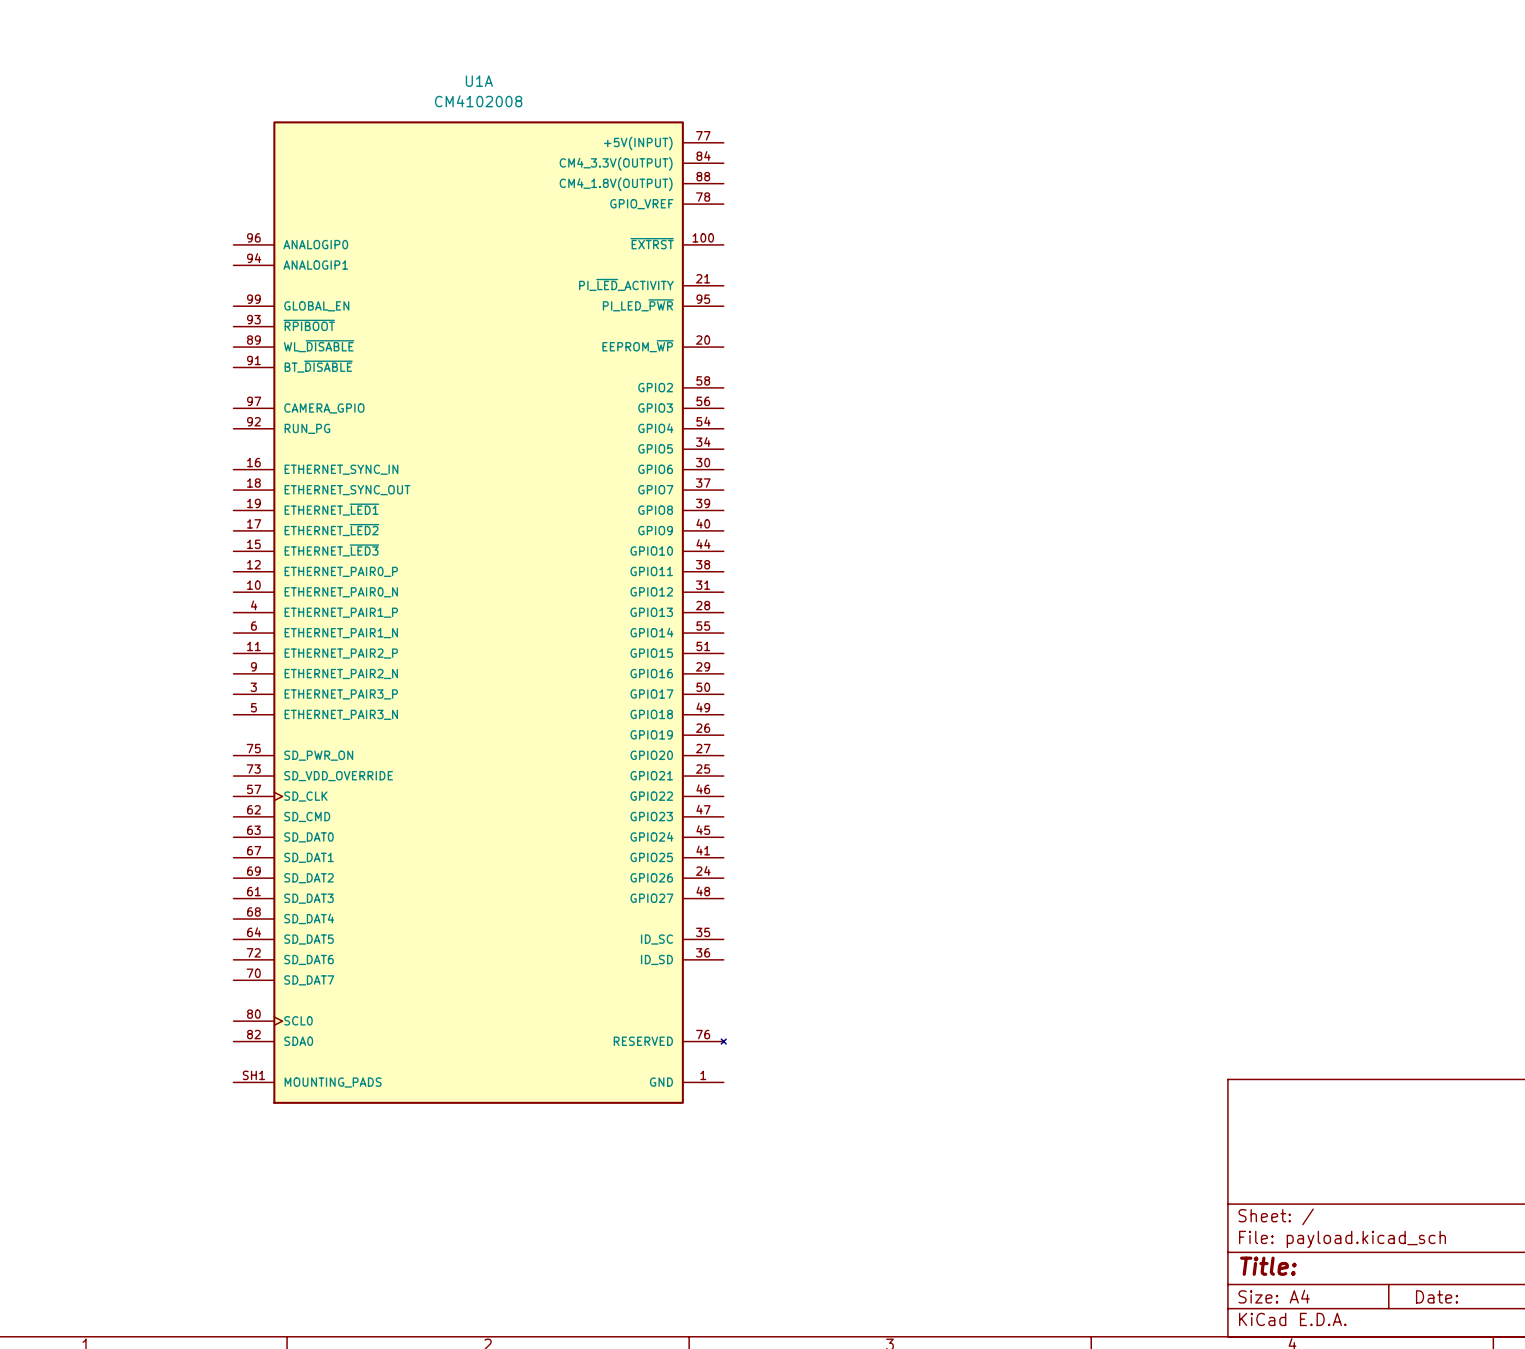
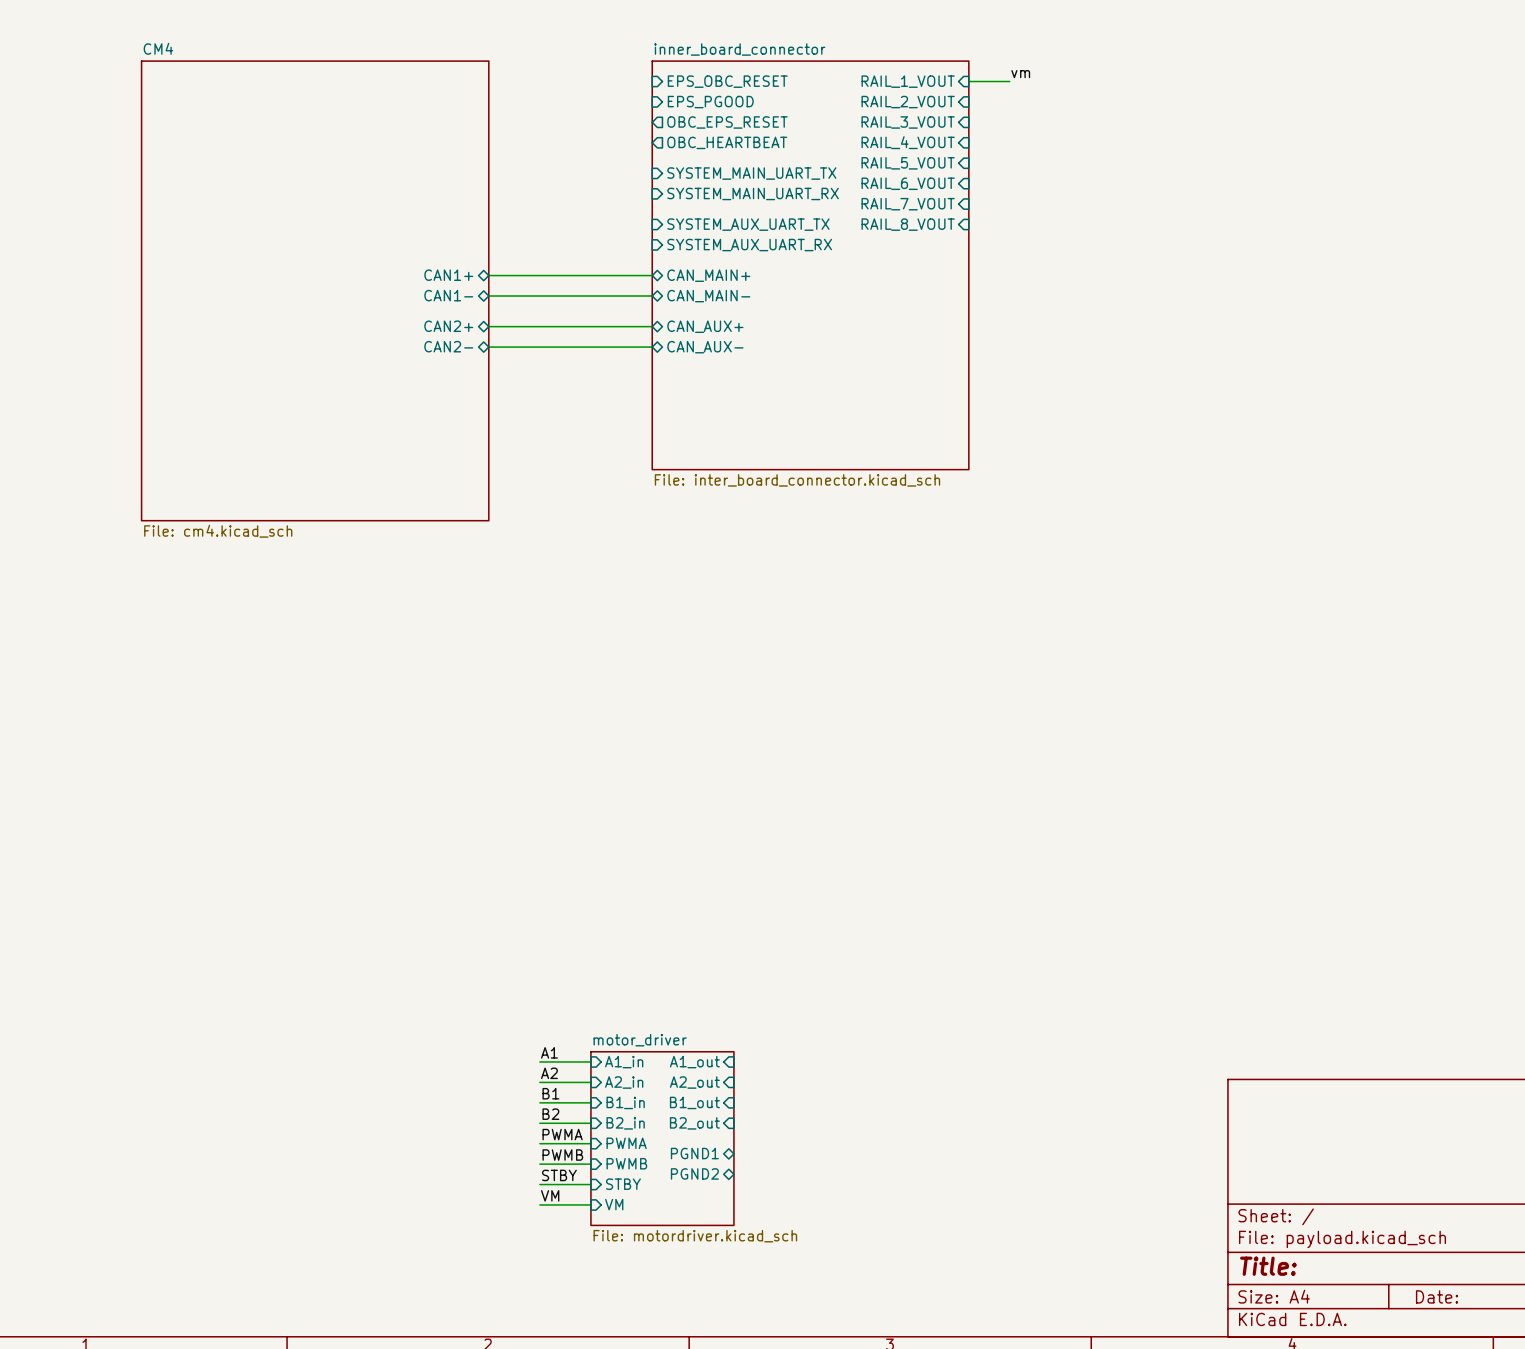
label: none -> vm (1020, 74)
sheet pin: none -> EPS_OBC_RESET (727, 81)
sheet pin: none -> RAIL_1_VOUT (908, 81)
wire: none -> (968, 81) (1009, 81)
sheet pin: none -> EPS_PGOOD (710, 102)
sheet pin: none -> RAIL_2_VOUT (908, 102)
sheet pin: none -> OBC_EPS_RESET (727, 122)
sheet pin: none -> RAIL_3_VOUT (908, 122)
sheet pin: none -> OBC_HEARTBEAT (727, 142)
sheet pin: none -> RAIL_4_VOUT (908, 142)
sheet pin: none -> RAIL_5_VOUT (908, 163)
sheet pin: none -> SYSTEM_MAIN_UART_TX (751, 173)
sheet pin: none -> RAIL_6_VOUT (908, 183)
sheet pin: none -> SYSTEM_MAIN_UART_RX (753, 193)
sheet pin: none -> RAIL_7_VOUT (908, 204)
sheet pin: none -> SYSTEM_AUX_UART_TX (748, 224)
sheet pin: none -> RAIL_8_VOUT (908, 224)
sheet pin: none -> SYSTEM_AUX_UART_RX (749, 245)
sheet inner_board_connector: none -> File: inter_board_connector.kicad_sch (810, 265)
sheet pin: none -> CAN1+ (448, 275)
sheet pin: none -> CAN_MAIN+ (708, 275)
sheet CM4: none -> File: cm4.kicad_sch (315, 290)
sheet pin: none -> CAN1- (448, 295)
sheet pin: none -> CAN_MAIN- (708, 296)
sheet pin: none -> CAN2+ (448, 326)
sheet pin: none -> CAN_AUX+ (705, 326)
sheet pin: none -> CAN2- (448, 346)
sheet pin: none -> CAN_AUX- (705, 347)
U1A: CM4102008 (479, 612) -> none
label: none -> A1 (549, 1052)
sheet pin: none -> A1_in (624, 1062)
sheet pin: none -> A1_out (694, 1062)
label: none -> A2 (549, 1073)
sheet pin: none -> A2_in (624, 1082)
sheet pin: none -> A2_out (694, 1082)
label: none -> B1 (550, 1093)
sheet pin: none -> B1_in (625, 1102)
sheet pin: none -> B1_out (694, 1102)
label: none -> B2 (550, 1114)
wire: none -> (539, 1123) (590, 1123)
sheet pin: none -> B2_in (625, 1123)
sheet pin: none -> B2_out (694, 1123)
label: none -> PWMA (562, 1134)
sheet motor_driver: none -> File: motordriver.kicad_sch (662, 1138)
wire: none -> (539, 1143) (590, 1143)
sheet pin: none -> PWMA (626, 1143)
sheet pin: none -> PGND1 (694, 1153)
label: none -> PWMB (562, 1155)
sheet pin: none -> PWMB (626, 1163)
wire: none -> (539, 1164) (590, 1164)
sheet pin: none -> PGND2 (694, 1173)
label: none -> STBY (559, 1175)
wire: none -> (539, 1184) (590, 1184)
sheet pin: none -> STBY (623, 1184)
label: none -> VM (550, 1195)
wire: none -> (539, 1204) (590, 1204)
sheet pin: none -> VM (614, 1204)

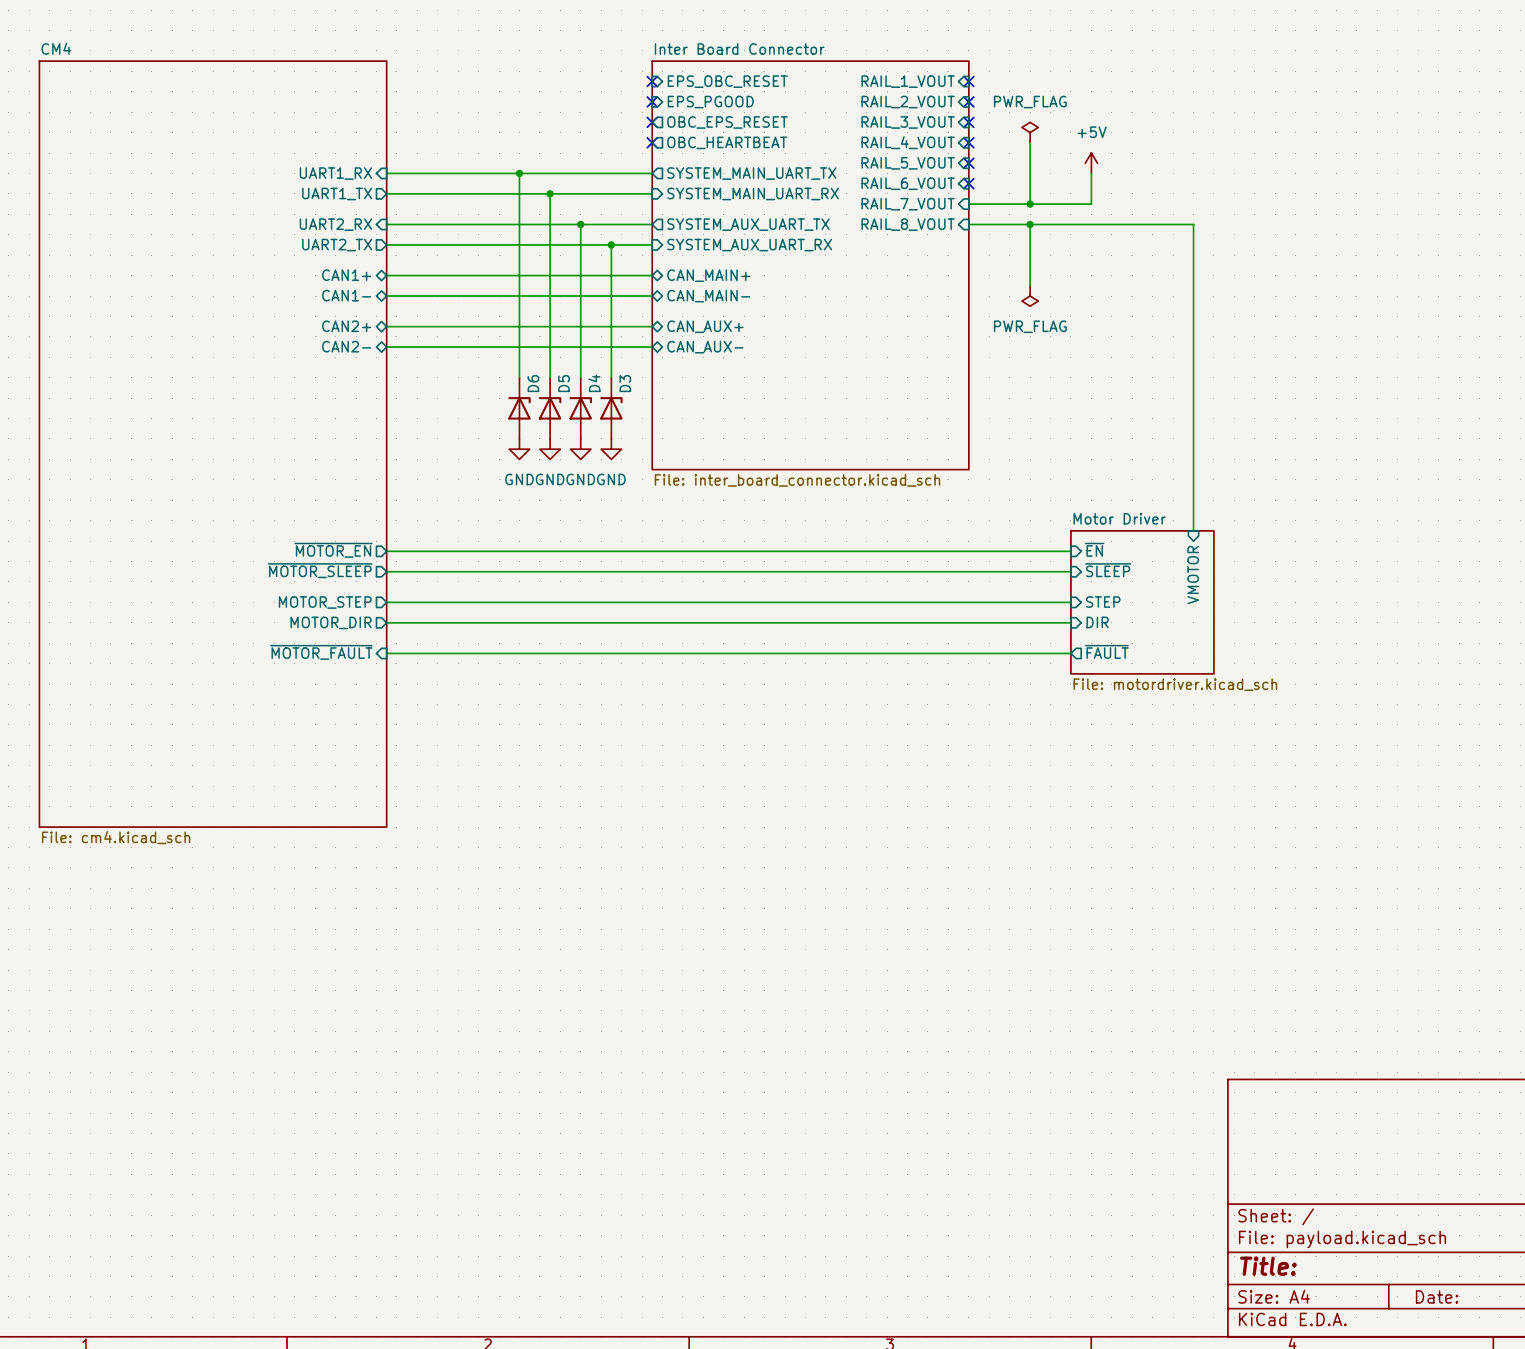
sheet CM4 name position: CM4 (158, 48) -> CM4 (56, 48)
sheet inner_board_connector name: inner_board_connector (739, 49) -> Inter Board Connector (739, 49)
sheet CM4 shape: [140, 60, 490, 522] -> [38, 60, 388, 828]
label: vm (1020, 74) -> none
no-connect mark: none -> (652, 81)
wire: (968, 81) (1009, 81) -> none
no-connect mark: none -> (968, 81)
no-connect mark: none -> (652, 101)
no-connect mark: none -> (968, 101)
no-connect mark: none -> (652, 122)
no-connect mark: none -> (968, 122)
power symbol: none -> PWR_FLAG (1030, 132)
no-connect mark: none -> (652, 142)
no-connect mark: none -> (968, 142)
wire: none -> (1030, 142) (1030, 204)
no-connect mark: none -> (968, 163)
power symbol: none -> +5V (1091, 163)
sheet pin: none -> UART1_RX (335, 173)
wire: none -> (386, 173) (652, 173)
wire: none -> (519, 173) (519, 377)
junction: none -> (519, 173)
sheet pin shape: input (751, 173) -> output (751, 173)
wire: none -> (1091, 173) (1091, 204) (968, 204)
no-connect mark: none -> (968, 183)
sheet pin: none -> UART1_TX (337, 193)
wire: none -> (386, 193) (652, 193)
wire: none -> (550, 193) (550, 377)
junction: none -> (550, 193)
junction: none -> (1030, 204)
sheet pin: none -> UART2_RX (335, 224)
wire: none -> (386, 224) (652, 224)
wire: none -> (580, 224) (580, 377)
junction: none -> (580, 224)
sheet pin shape: input (748, 224) -> output (748, 224)
wire: none -> (968, 224) (1193, 224) (1193, 530)
wire: none -> (1030, 224) (1030, 285)
junction: none -> (1030, 224)
wire: none -> (386, 244) (652, 244)
wire: none -> (611, 244) (611, 377)
junction: none -> (611, 244)
sheet pin: none -> UART2_TX (337, 245)
wire: none -> (386, 275) (488, 275)
sheet pin position: CAN1+ (448, 275) -> CAN1+ (346, 275)
sheet pin position: CAN1- (448, 295) -> CAN1- (346, 295)
wire: none -> (386, 296) (488, 296)
power symbol: none -> PWR_FLAG (1030, 296)
wire: none -> (386, 326) (488, 326)
sheet pin position: CAN2+ (448, 326) -> CAN2+ (346, 326)
sheet pin position: CAN2- (448, 346) -> CAN2- (346, 346)
wire: none -> (386, 347) (488, 347)
D6: none -> (519, 408)
D5: none -> (550, 408)
D4: none -> (580, 408)
D3: none -> (611, 408)
power symbol: none -> GND (519, 449)
power symbol: none -> GND (550, 449)
power symbol: none -> GND (580, 449)
power symbol: none -> GND (611, 449)
sheet CM4 value position: File: cm4.kicad_sch (218, 531) -> File: cm4.kicad_sch (116, 837)
sheet pin: none -> ~{EN} (1094, 549)
sheet pin: none -> ~{MOTOR_EN} (333, 550)
wire: none -> (386, 551) (1070, 551)
sheet pin: none -> ~{MOTOR_SLEEP} (320, 570)
sheet pin: none -> ~{SLEEP} (1108, 570)
wire: none -> (386, 571) (1070, 571)
sheet pin: none -> VMOTOR (1193, 575)
sheet pin: none -> MOTOR_STEP (325, 602)
wire: none -> (386, 602) (1070, 602)
sheet pin: none -> STEP (1103, 602)
sheet Motor Driver: none -> File: motordriver.kicad_sch (1142, 602)
sheet pin: none -> MOTOR_DIR (331, 622)
wire: none -> (386, 622) (1070, 622)
sheet pin: none -> DIR (1097, 622)
sheet pin: none -> ~{FAULT} (1106, 651)
sheet pin: none -> ~{MOTOR_FAULT} (321, 652)
wire: none -> (386, 653) (1070, 653)
label: A1 (549, 1052) -> none
wire: (539, 1061) (590, 1061) -> none
sheet pin: A1_in (624, 1062) -> none
sheet pin: A1_out (694, 1062) -> none
label: A2 (549, 1073) -> none
wire: (539, 1082) (590, 1082) -> none
sheet pin: A2_in (624, 1082) -> none
sheet pin: A2_out (694, 1082) -> none
label: B1 (550, 1093) -> none
wire: (539, 1102) (590, 1102) -> none
sheet pin: B1_in (625, 1102) -> none
sheet pin: B1_out (694, 1102) -> none
label: B2 (550, 1114) -> none
wire: (539, 1123) (590, 1123) -> none
sheet pin: B2_in (625, 1123) -> none
sheet pin: B2_out (694, 1123) -> none
label: PWMA (562, 1134) -> none
sheet motor_driver: File: motordriver.kicad_sch (662, 1138) -> none
wire: (539, 1143) (590, 1143) -> none
sheet pin: PWMA (626, 1143) -> none
sheet pin: PGND1 (694, 1153) -> none
label: PWMB (562, 1155) -> none
sheet pin: PWMB (626, 1163) -> none
wire: (539, 1164) (590, 1164) -> none
sheet pin: PGND2 (694, 1173) -> none
label: STBY (559, 1175) -> none
wire: (539, 1184) (590, 1184) -> none
sheet pin: STBY (623, 1184) -> none
label: VM (550, 1195) -> none
wire: (539, 1204) (590, 1204) -> none
sheet pin: VM (614, 1204) -> none

